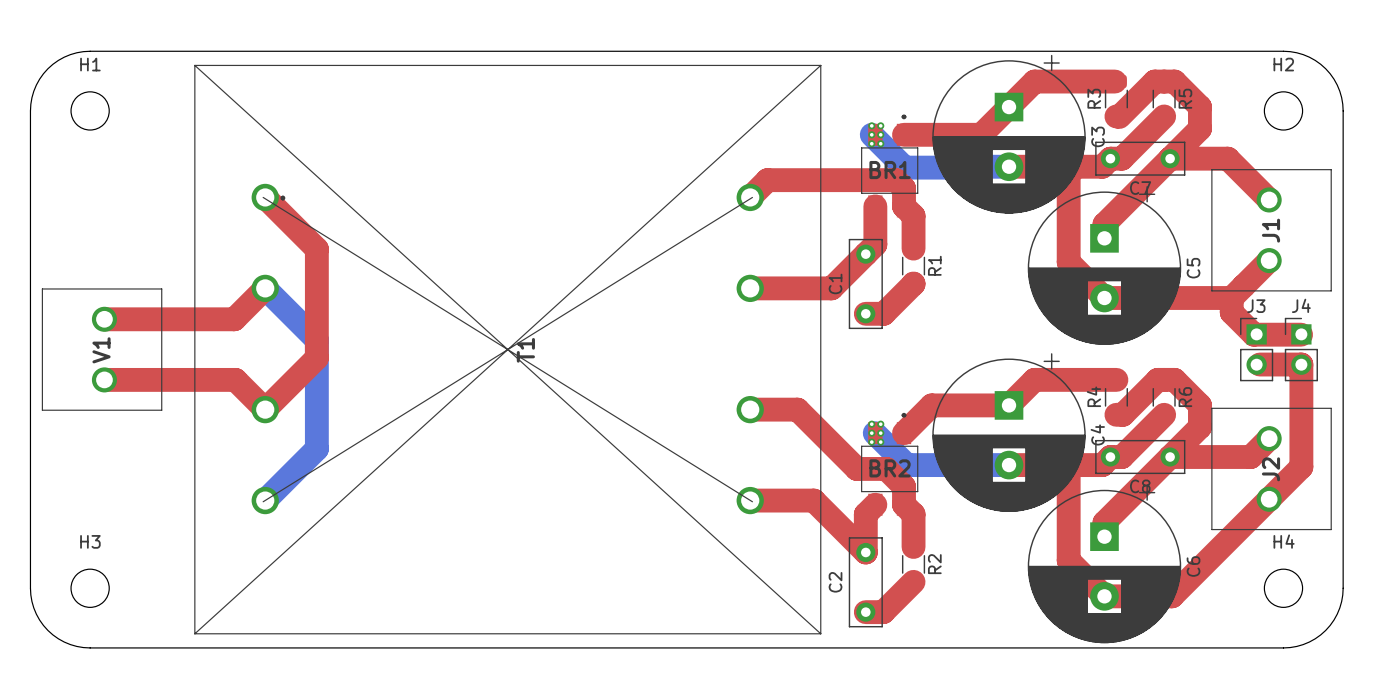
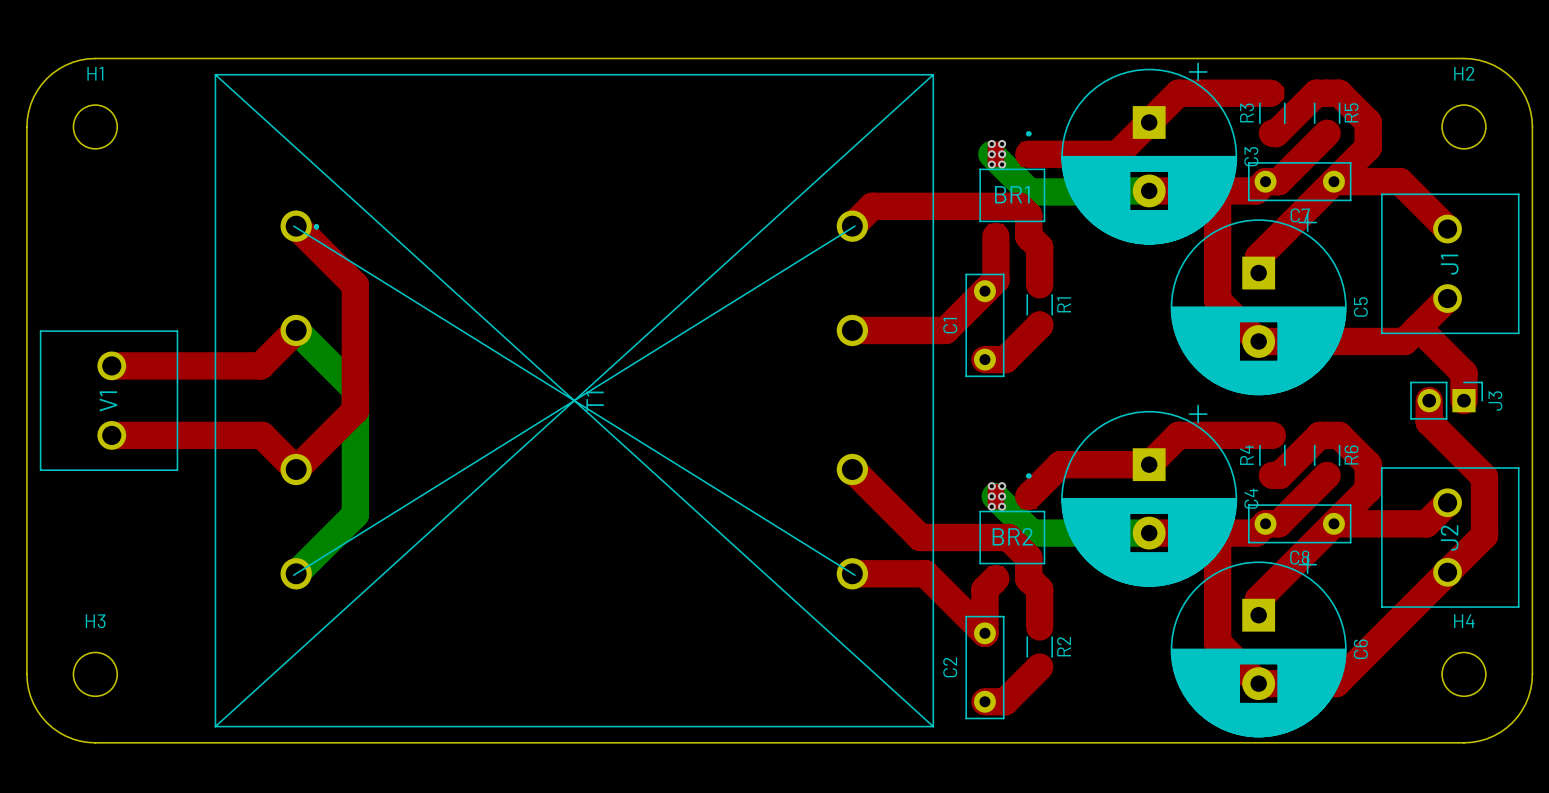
top track: none -> (1418, 327) (1463, 373) (1463, 400)
top track: (1231, 298) (1231, 312) (1253, 334) (1301, 334) -> none
J3 rotation: 0° (1256, 349) -> 90° clockwise (1446, 400)
J4: (1301, 349) -> none
top track: (1259, 364) (1301, 364) (1301, 416) -> (1429, 400) (1429, 422) (1484, 477)
top track: (750, 409) (797, 409) (856, 468) -> (852, 469) (920, 537) (974, 537)

